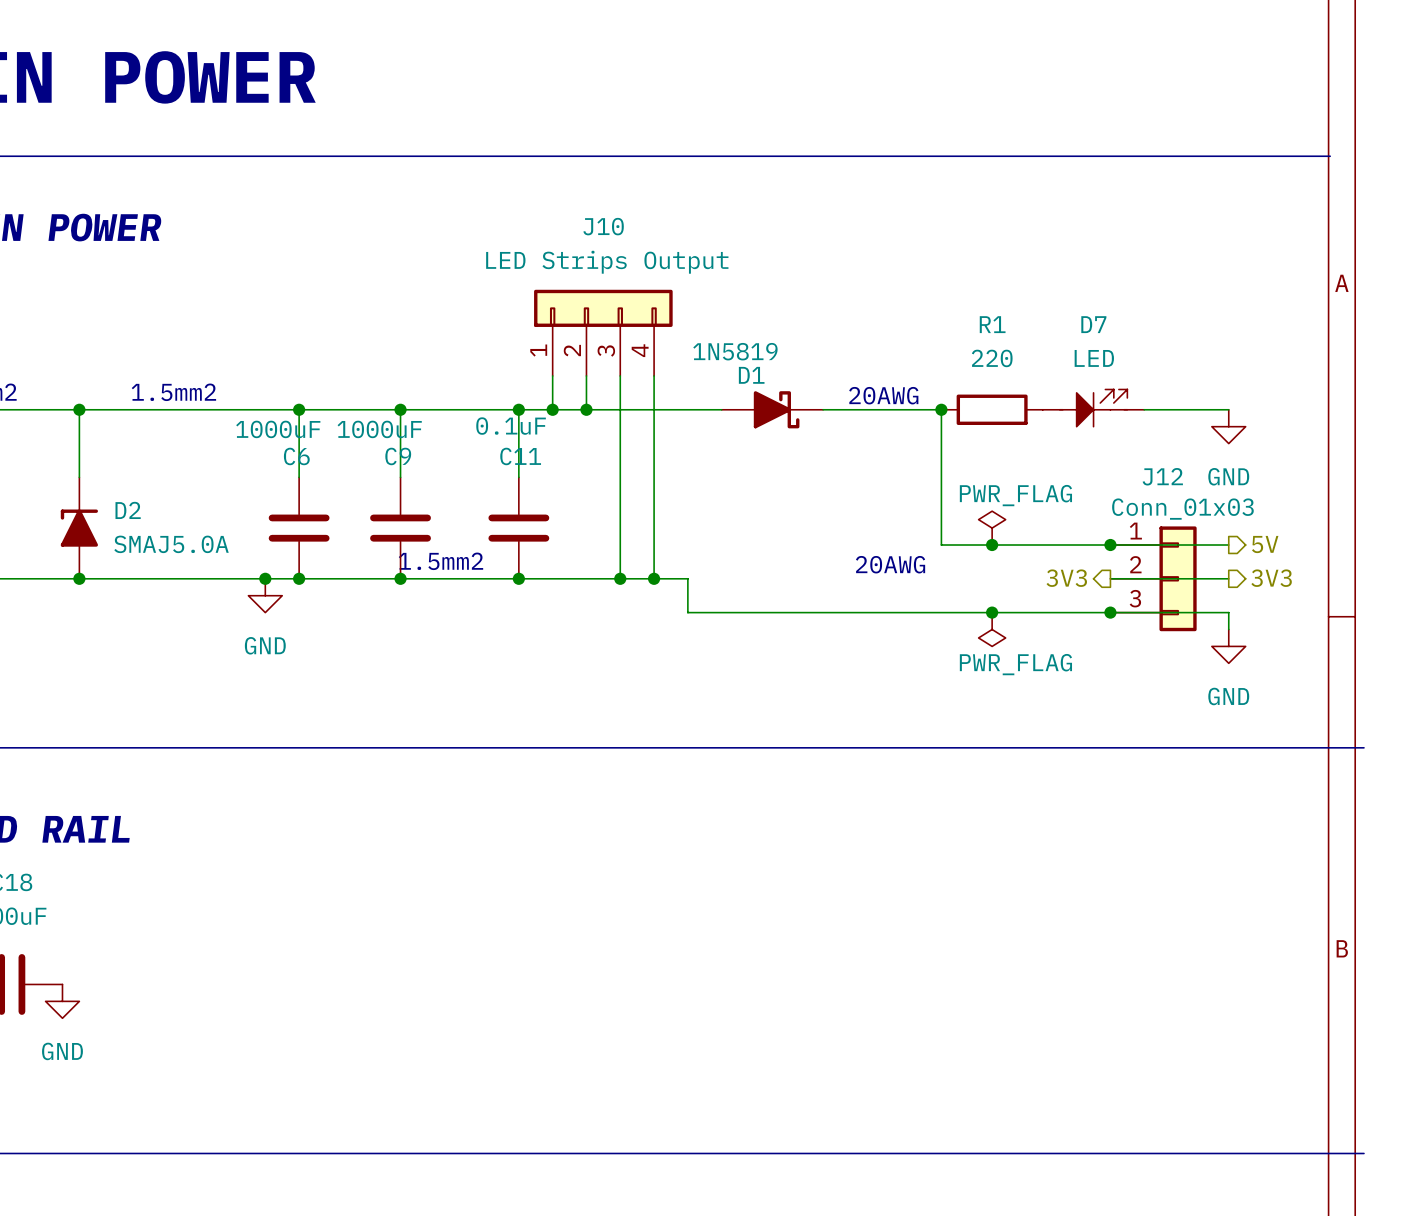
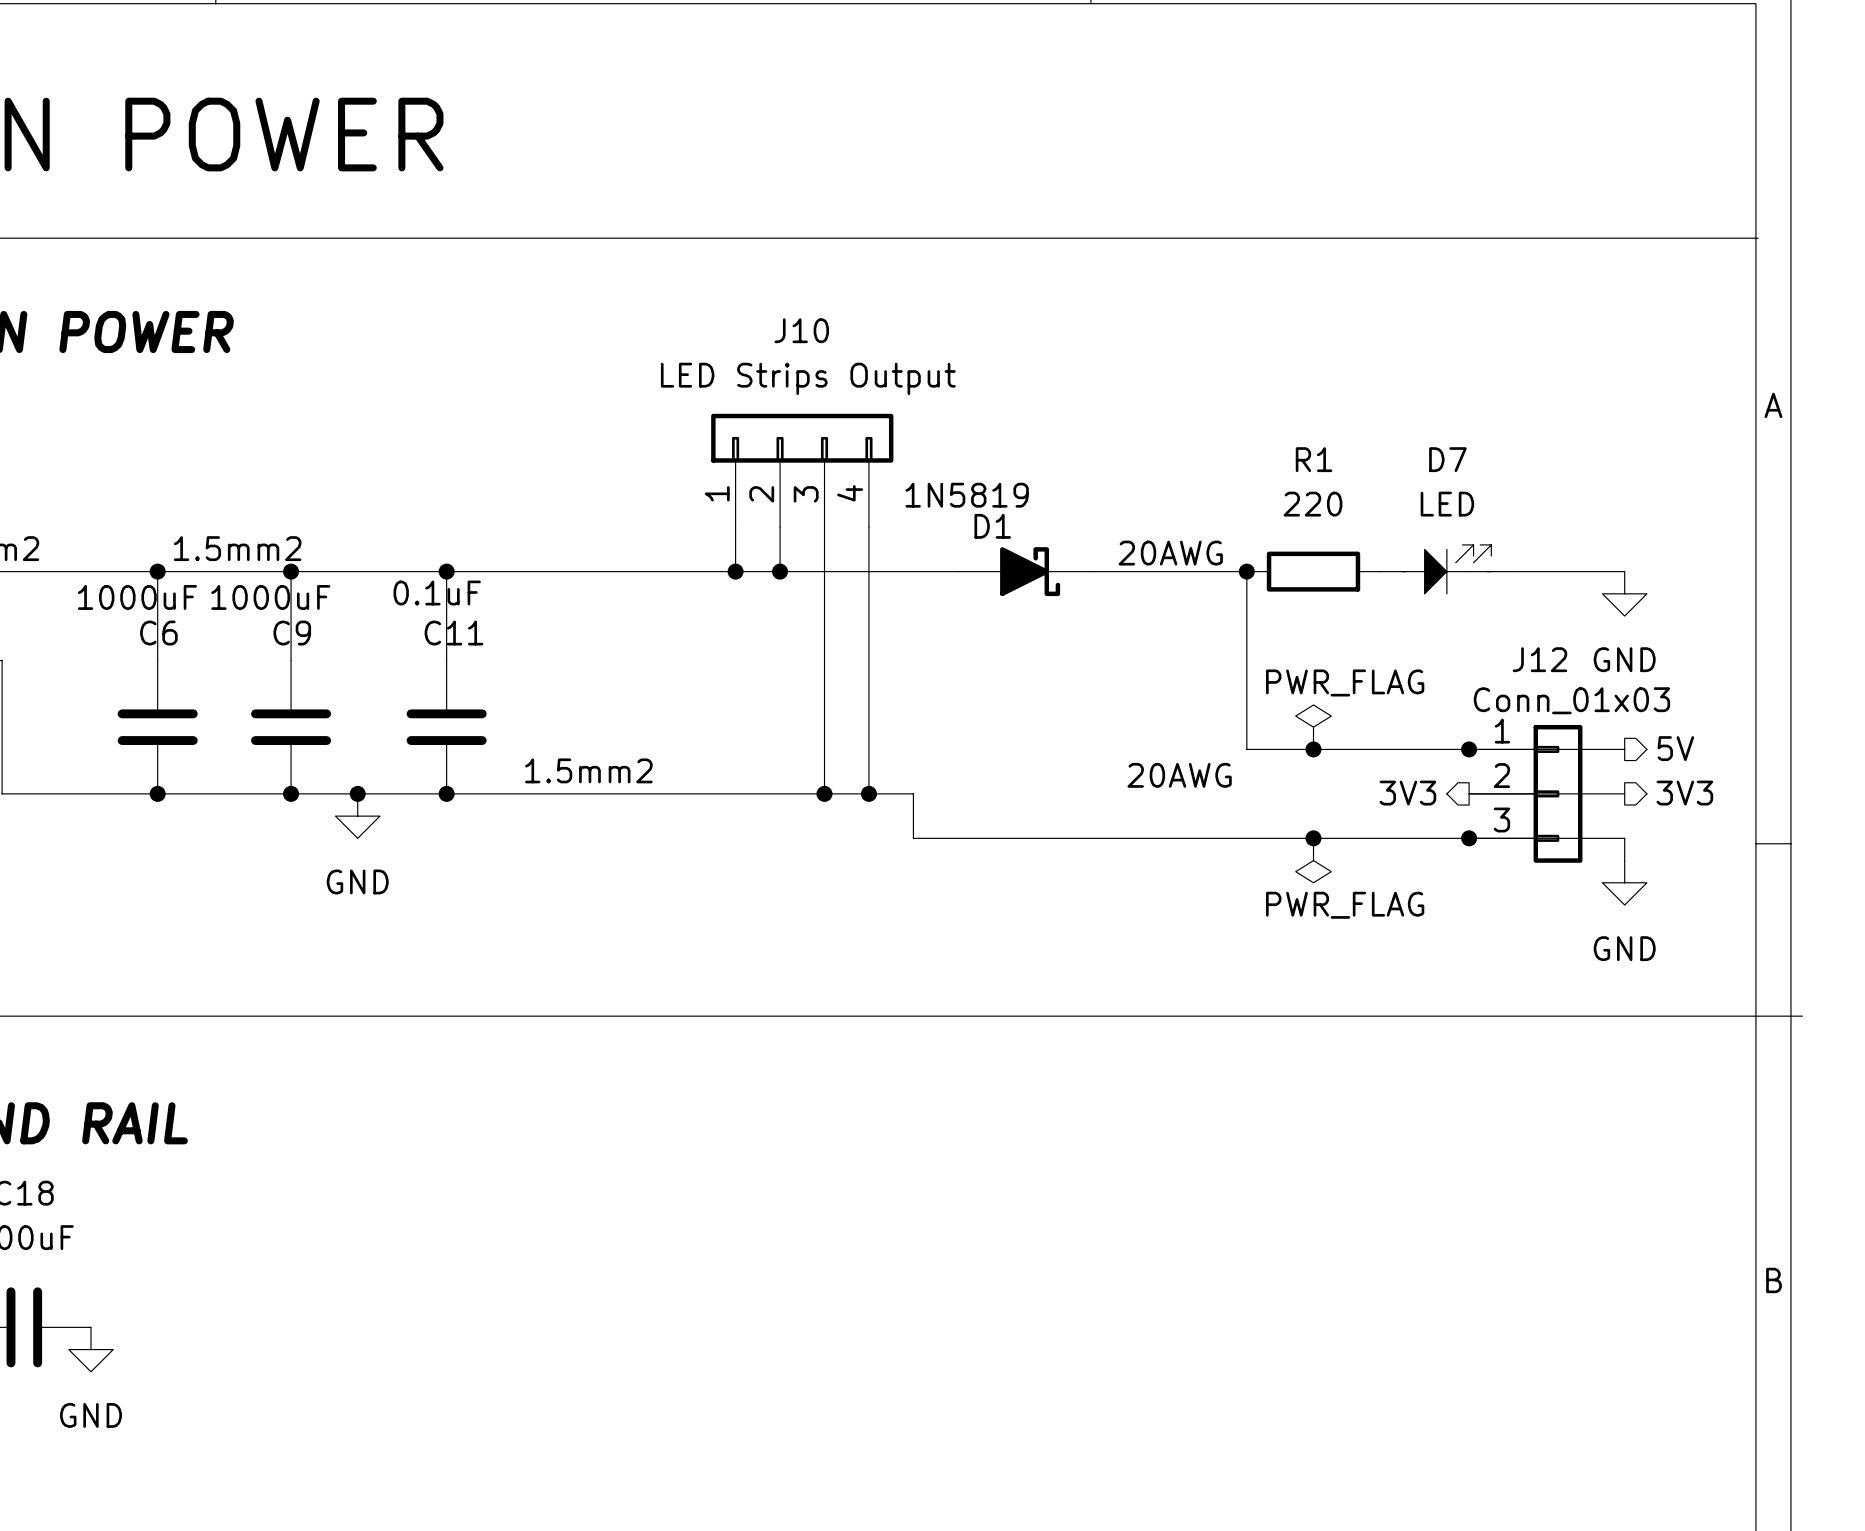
wire: (79, 409) (79, 477) -> none
junction position: (79, 409) -> (157, 571)
junction: none -> (291, 571)
wire: (299, 409) (299, 477) -> (157, 571) (157, 660)
junction: (299, 409) -> none
junction: none -> (446, 571)
wire: (400, 409) (400, 477) -> (291, 571) (291, 660)
junction: (400, 409) -> none
wire: (518, 409) (518, 477) -> (446, 571) (446, 660)
junction: (518, 409) -> none
D2: SMAJ5.0A (79, 528) -> none
C6 position: (299, 528) -> (157, 727)
C9 position: (400, 528) -> (291, 727)
C11 position: (518, 528) -> (446, 727)
junction position: (79, 578) -> (157, 793)
junction: none -> (291, 793)
junction: (299, 578) -> none
junction: none -> (446, 793)
junction: (400, 578) -> none
junction: (518, 578) -> none

